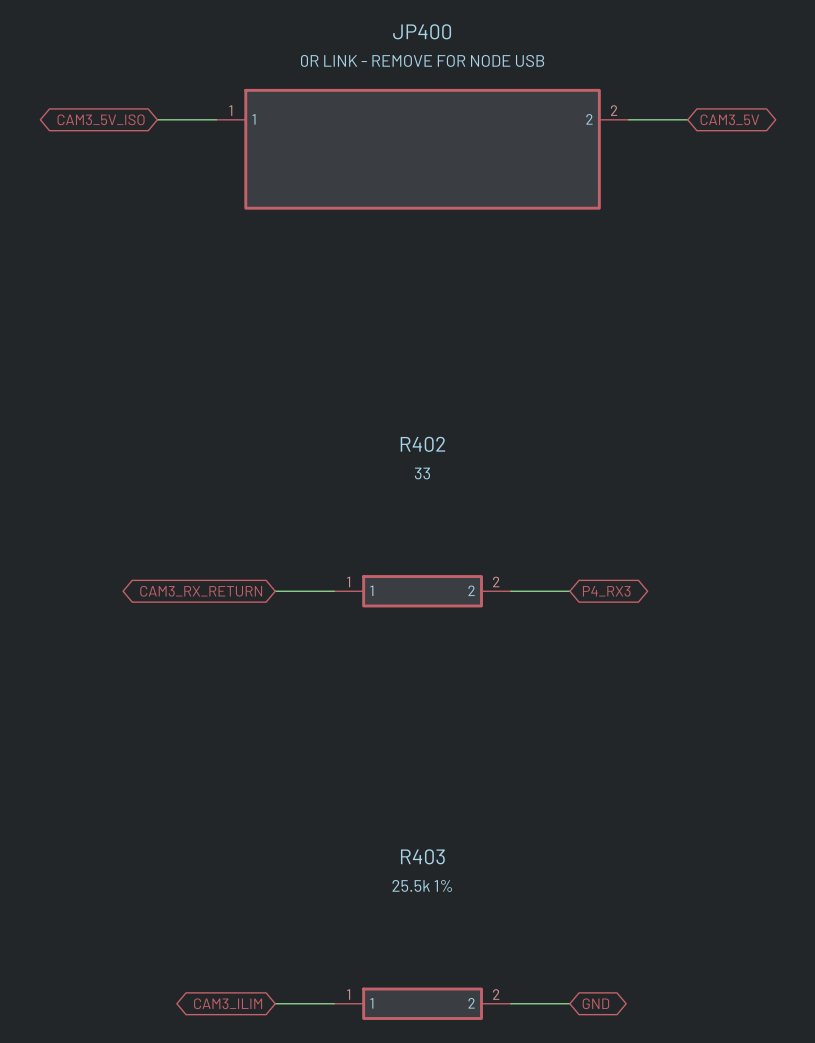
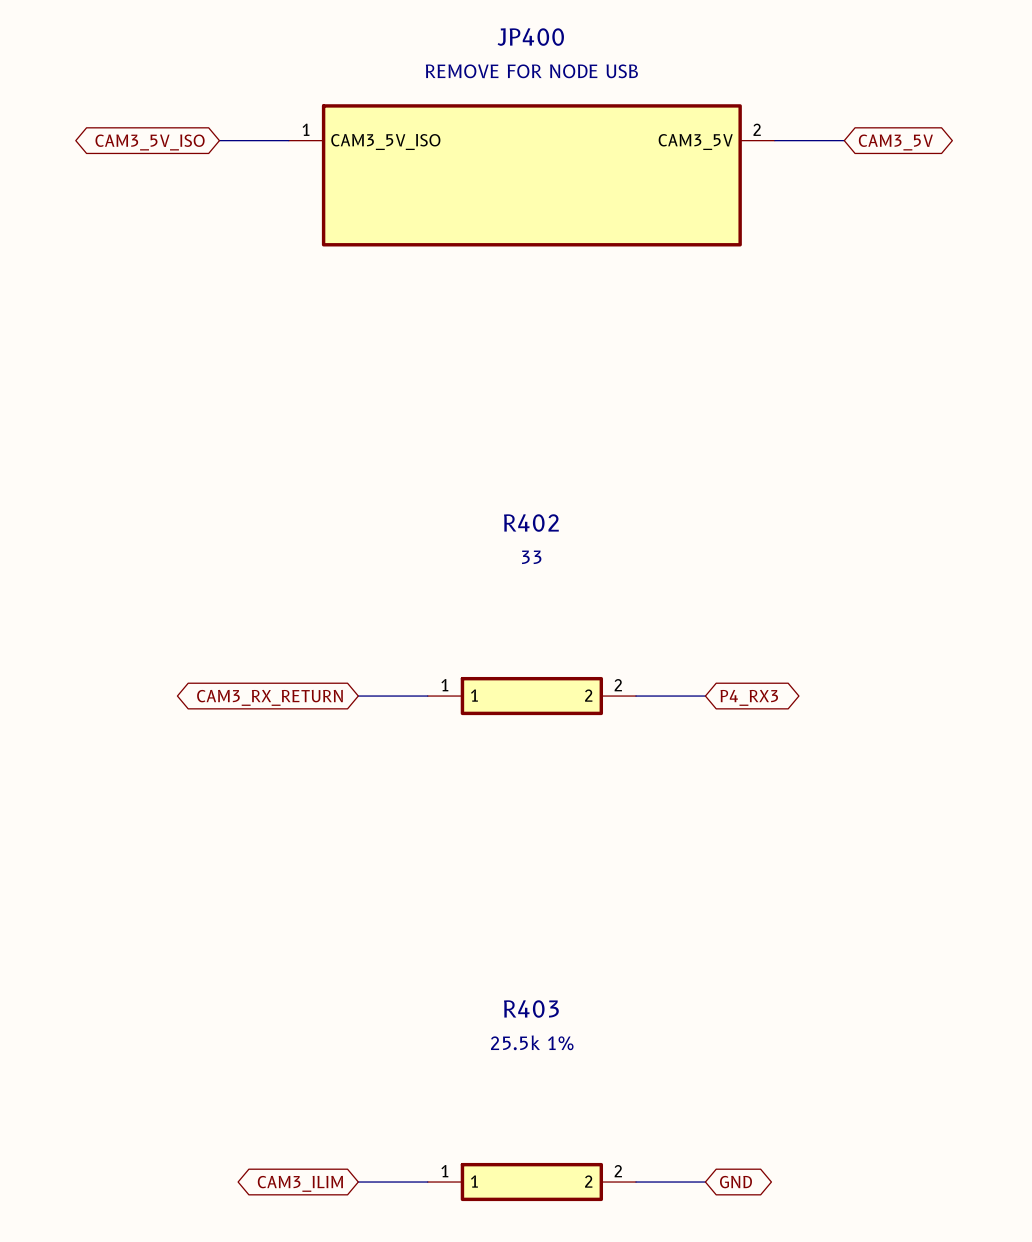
JP400 value: 0R LINK - REMOVE FOR NODE USB (422, 60) -> REMOVE FOR NODE USB (531, 71)
JP400 pin name: 1 (254, 119) -> CAM3_5V_ISO (385, 142)
JP400 pin name: 2 (589, 119) -> CAM3_5V (695, 142)

